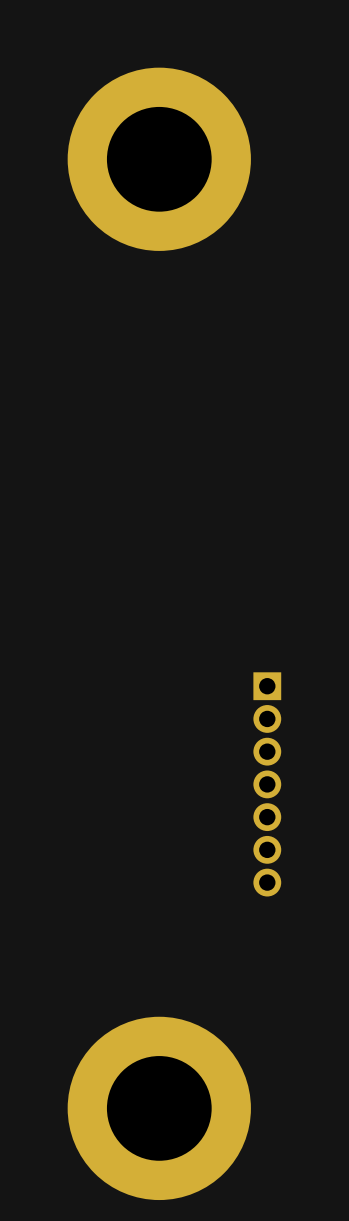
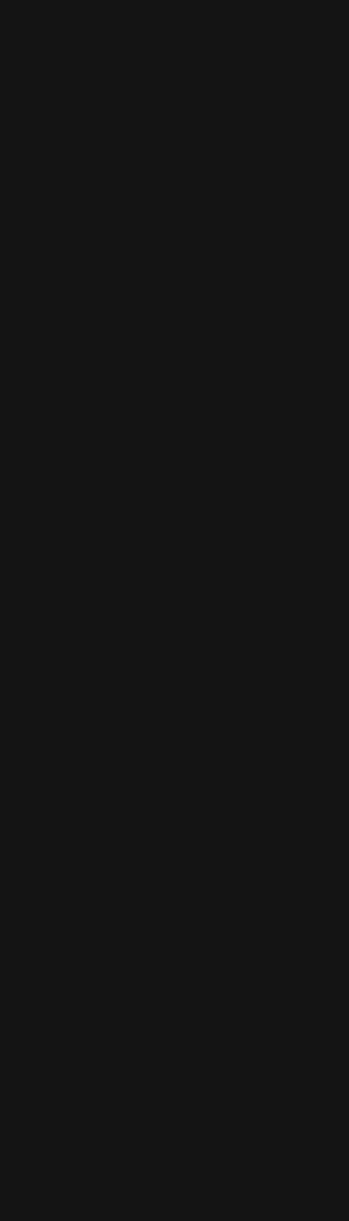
part: (159, 159) -> none
part: (267, 784) -> none
part: (159, 1108) -> none

